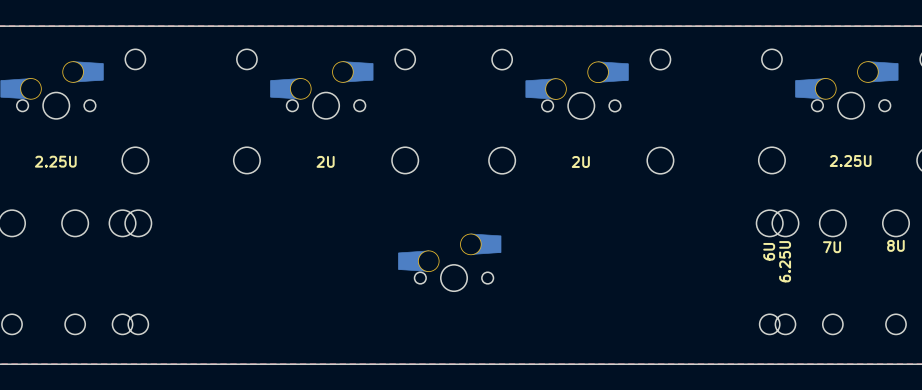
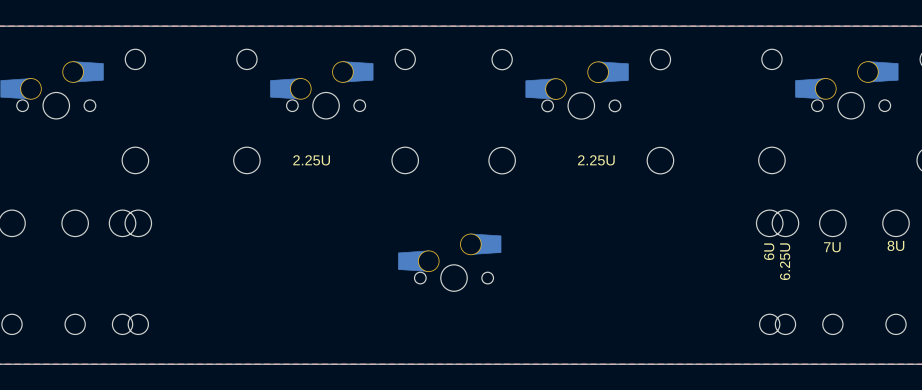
text: none -> 2.25U (311, 160)
text: none -> 2.25U (596, 160)
text: 2.25U (55, 161) -> none
text: 2U (325, 161) -> none
text: 2.25U (850, 161) -> none
text: 2U (580, 162) -> none

